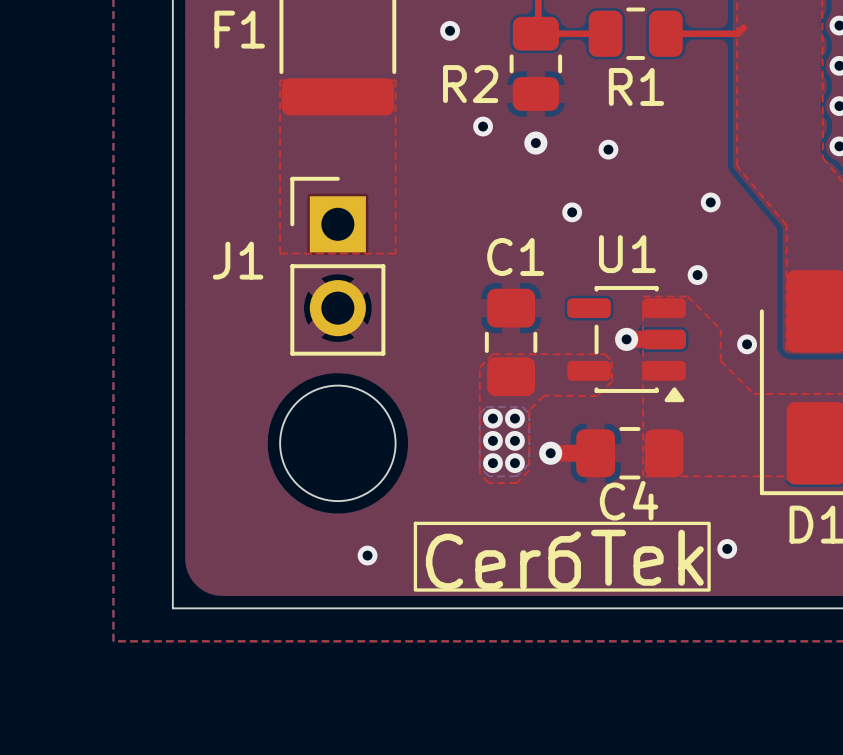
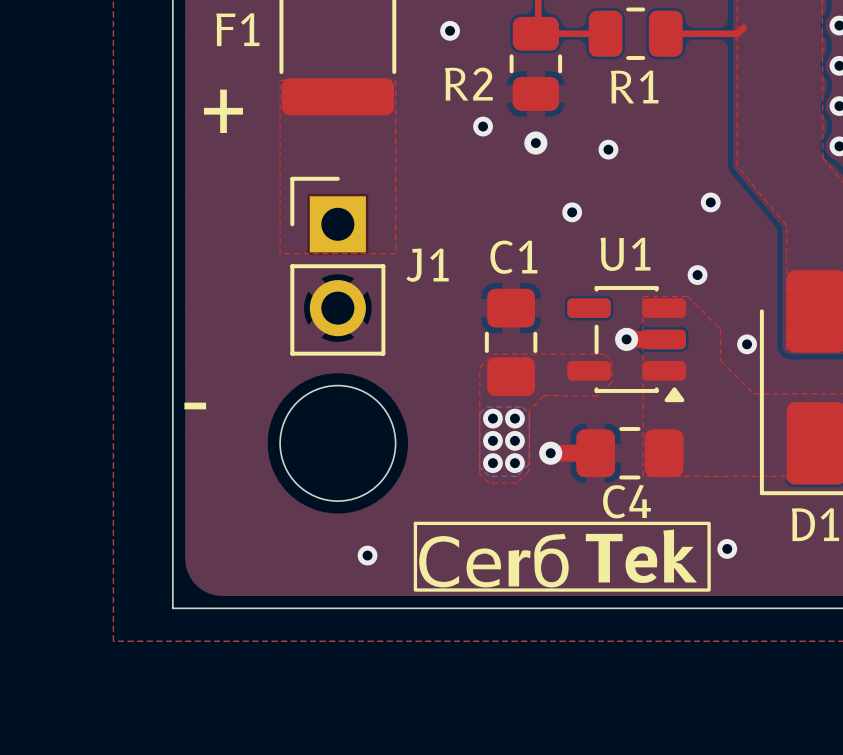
text: none -> + (223, 111)
J1 name position: J1 (238, 260) -> J1 (427, 265)
text: none -> - (195, 405)

